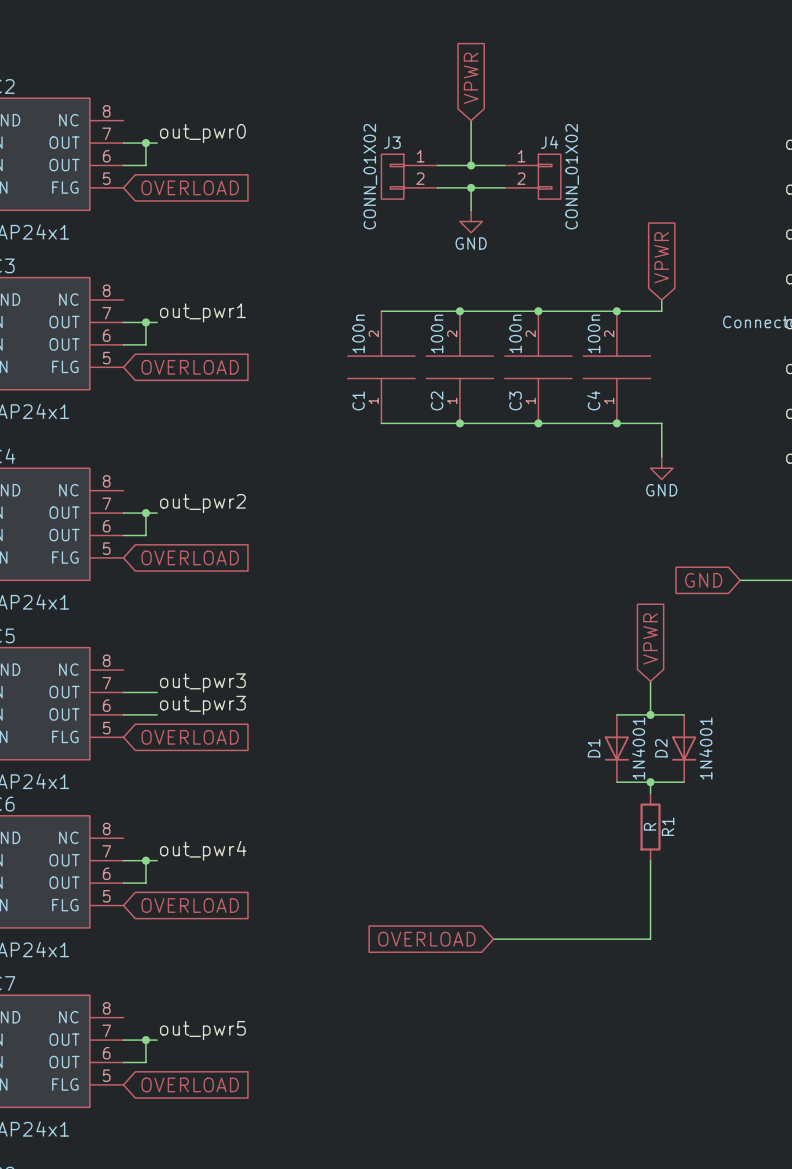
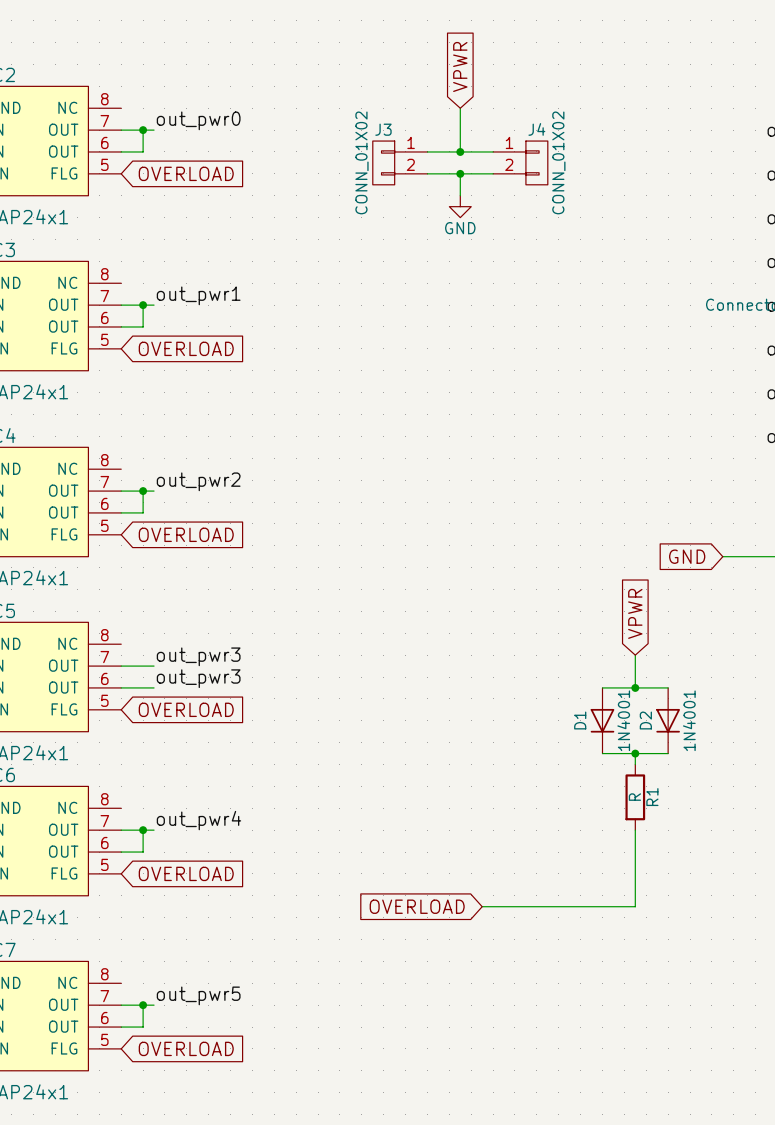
global label: VPWR (661, 257) -> none
wire: (661, 300) (661, 311) (381, 311) -> none
junction: (459, 311) -> none
junction: (538, 311) -> none
junction: (616, 311) -> none
C1: 100n (381, 367) -> none
C2: 100n (459, 367) -> none
C3: 100n (538, 367) -> none
C4: 100n (616, 367) -> none
wire: (381, 423) (661, 423) (661, 457) -> none
junction: (459, 423) -> none
junction: (538, 423) -> none
junction: (616, 423) -> none
power symbol: GND (661, 468) -> none

